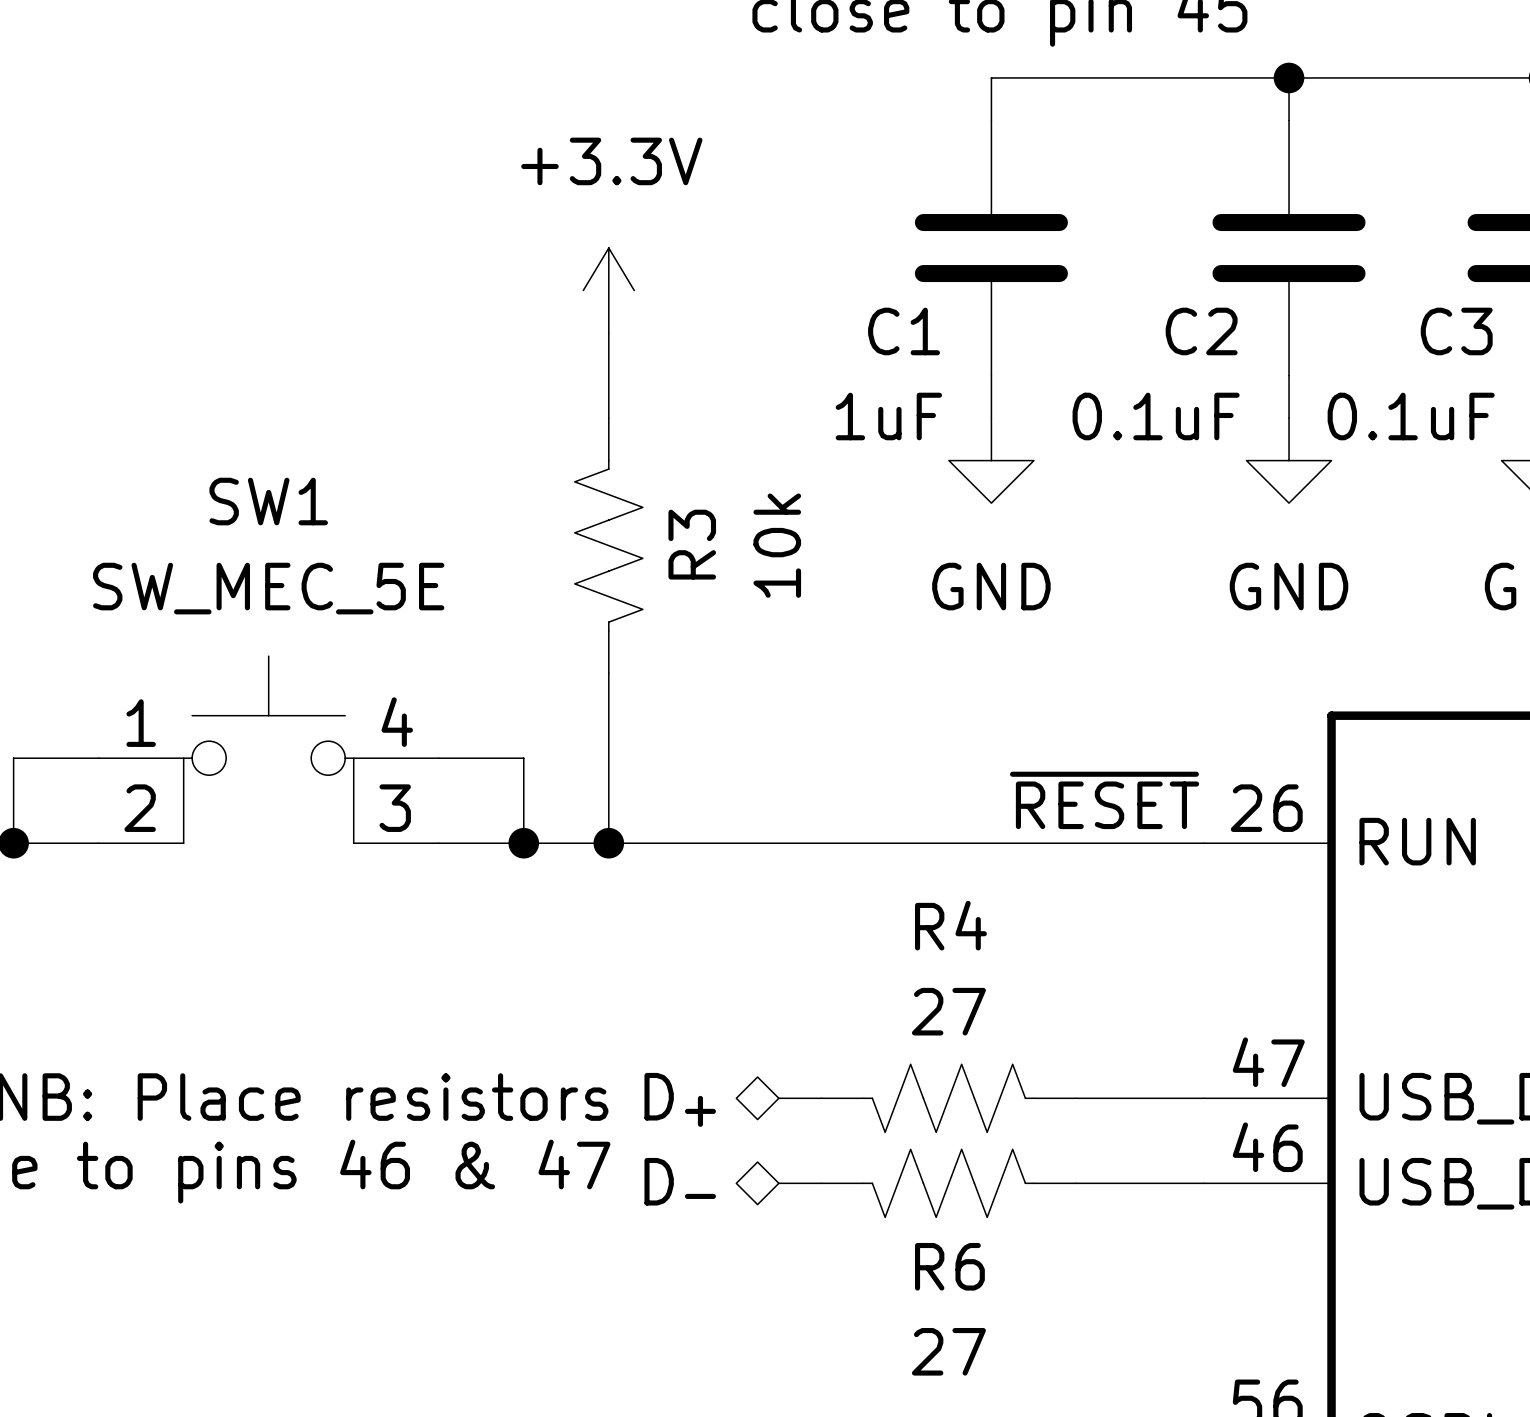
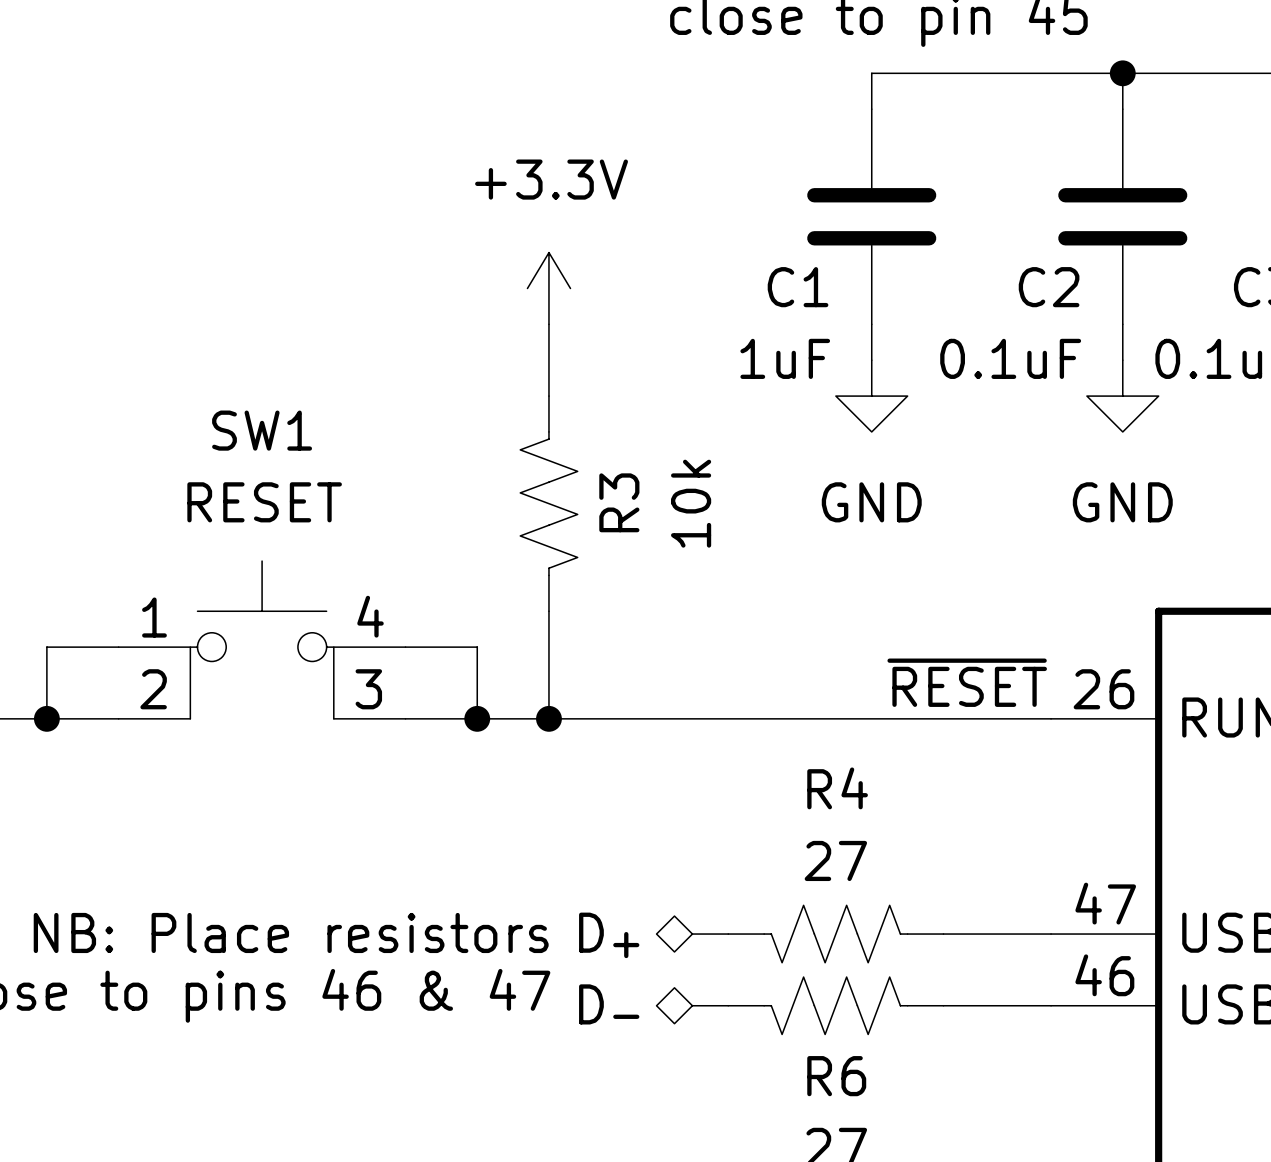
power symbol position: +3.3V (608, 290) -> +3.3V (548, 288)
R3 position: (608, 545) -> (548, 503)
SW1 value: SW_MEC_5E (268, 588) -> RESET (264, 502)

